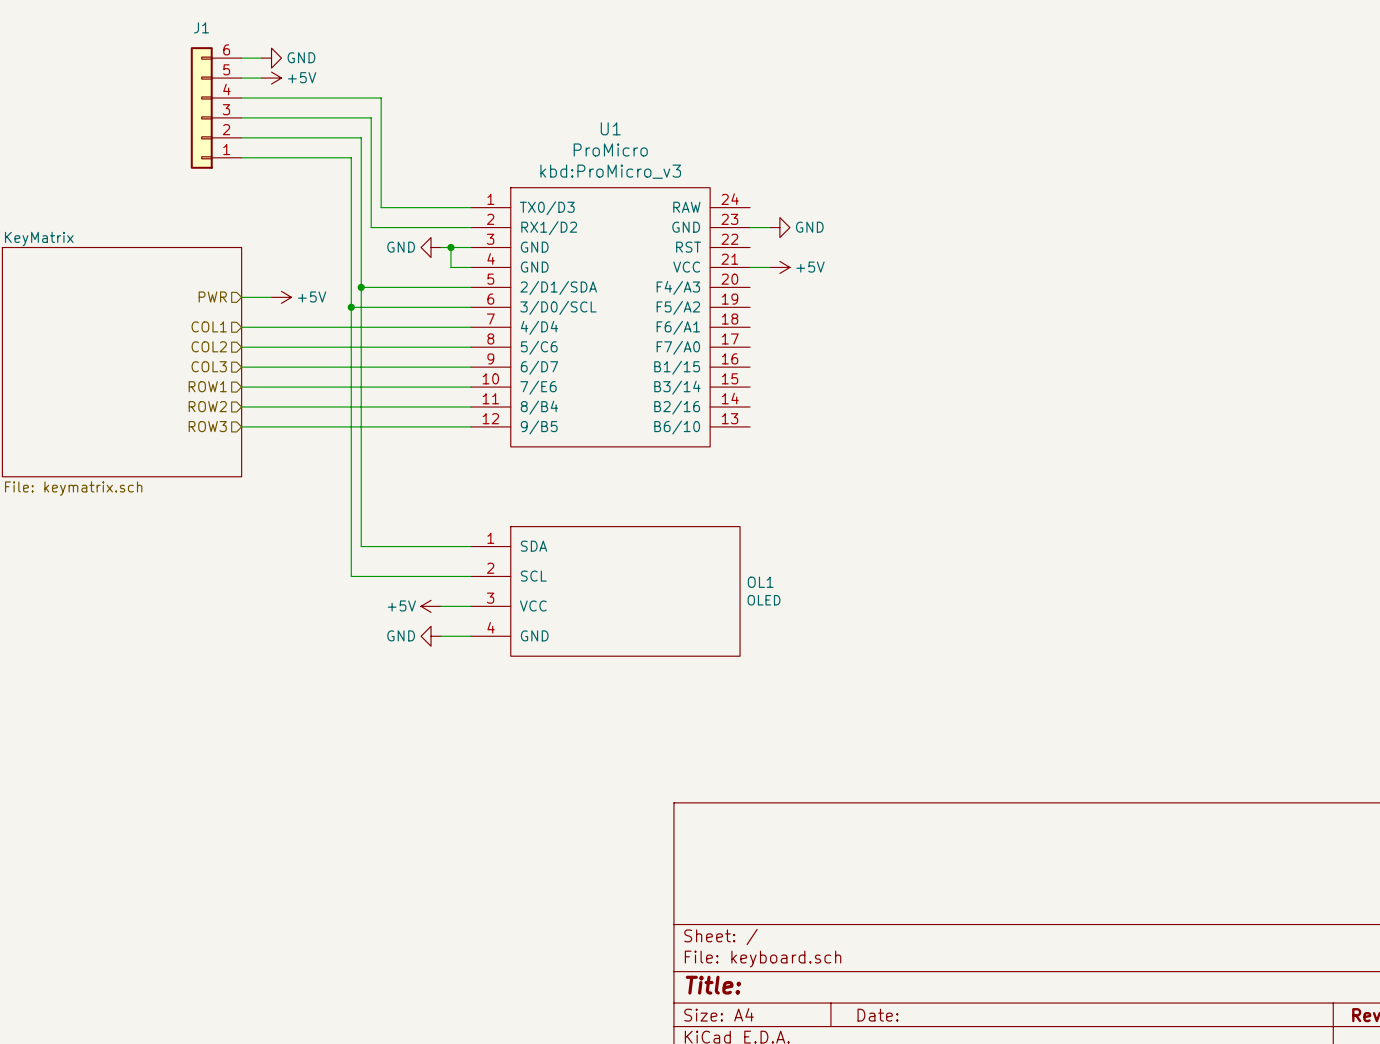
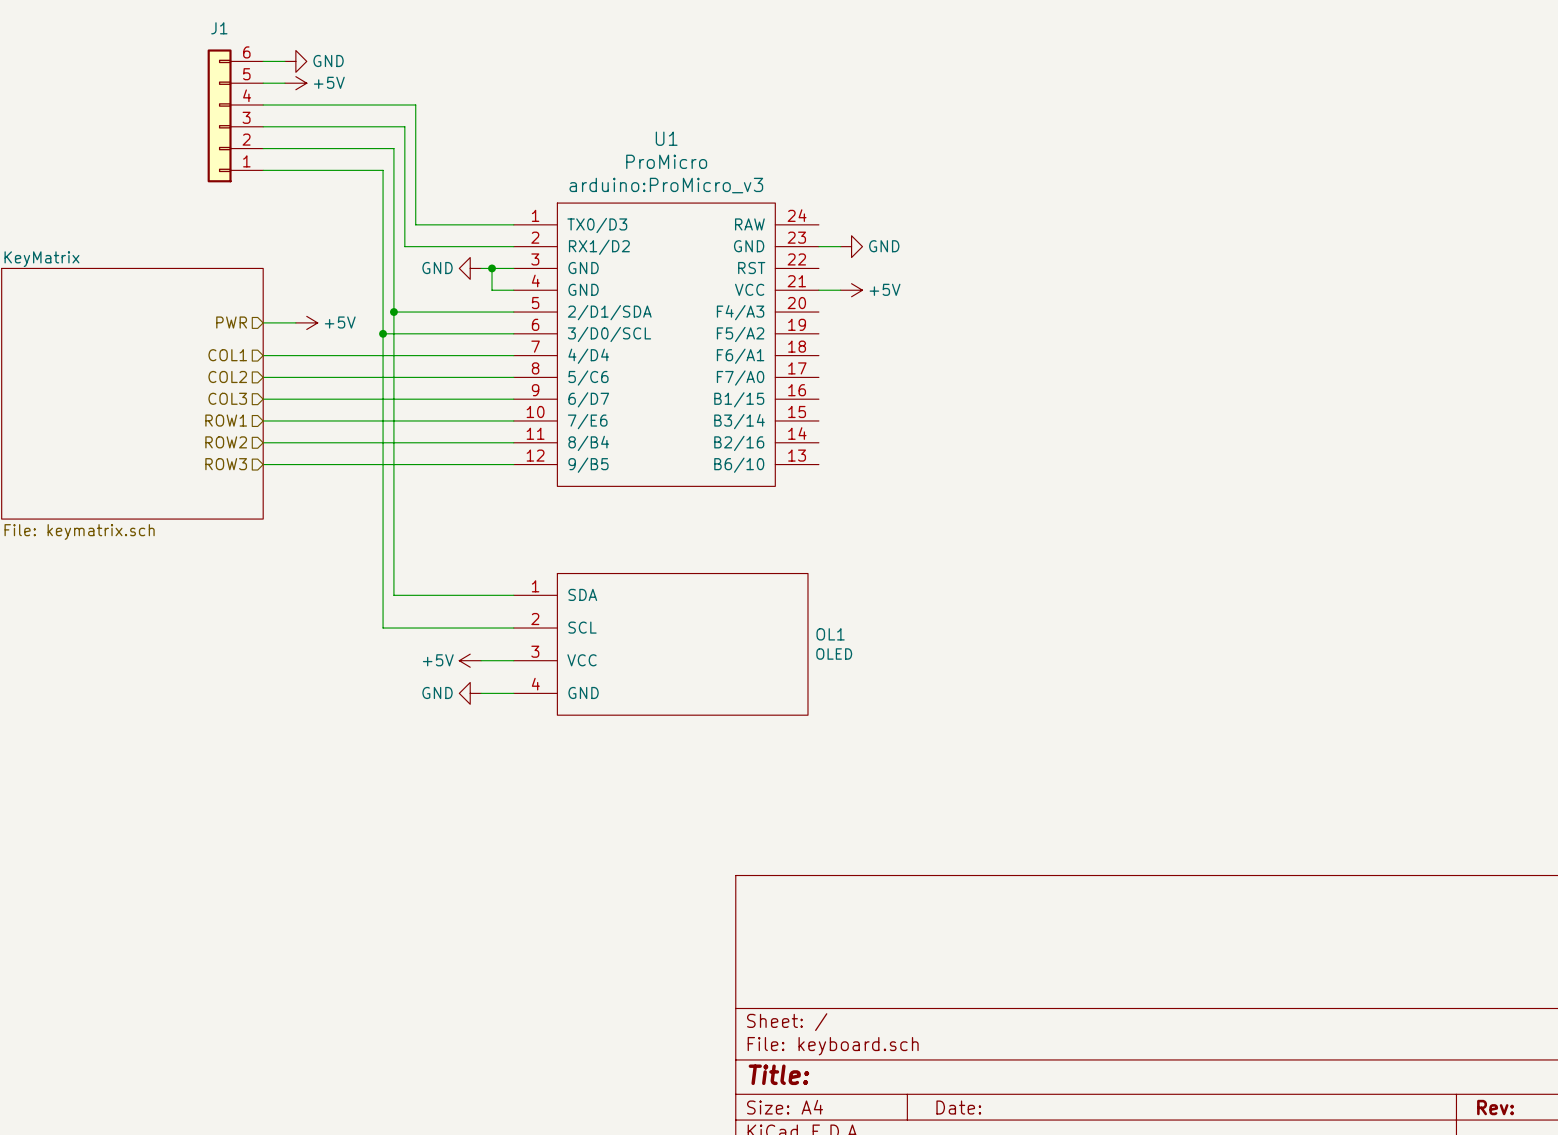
U1 text: kbd:ProMicro_v3 (610, 171) -> arduino:ProMicro_v3 (666, 185)

